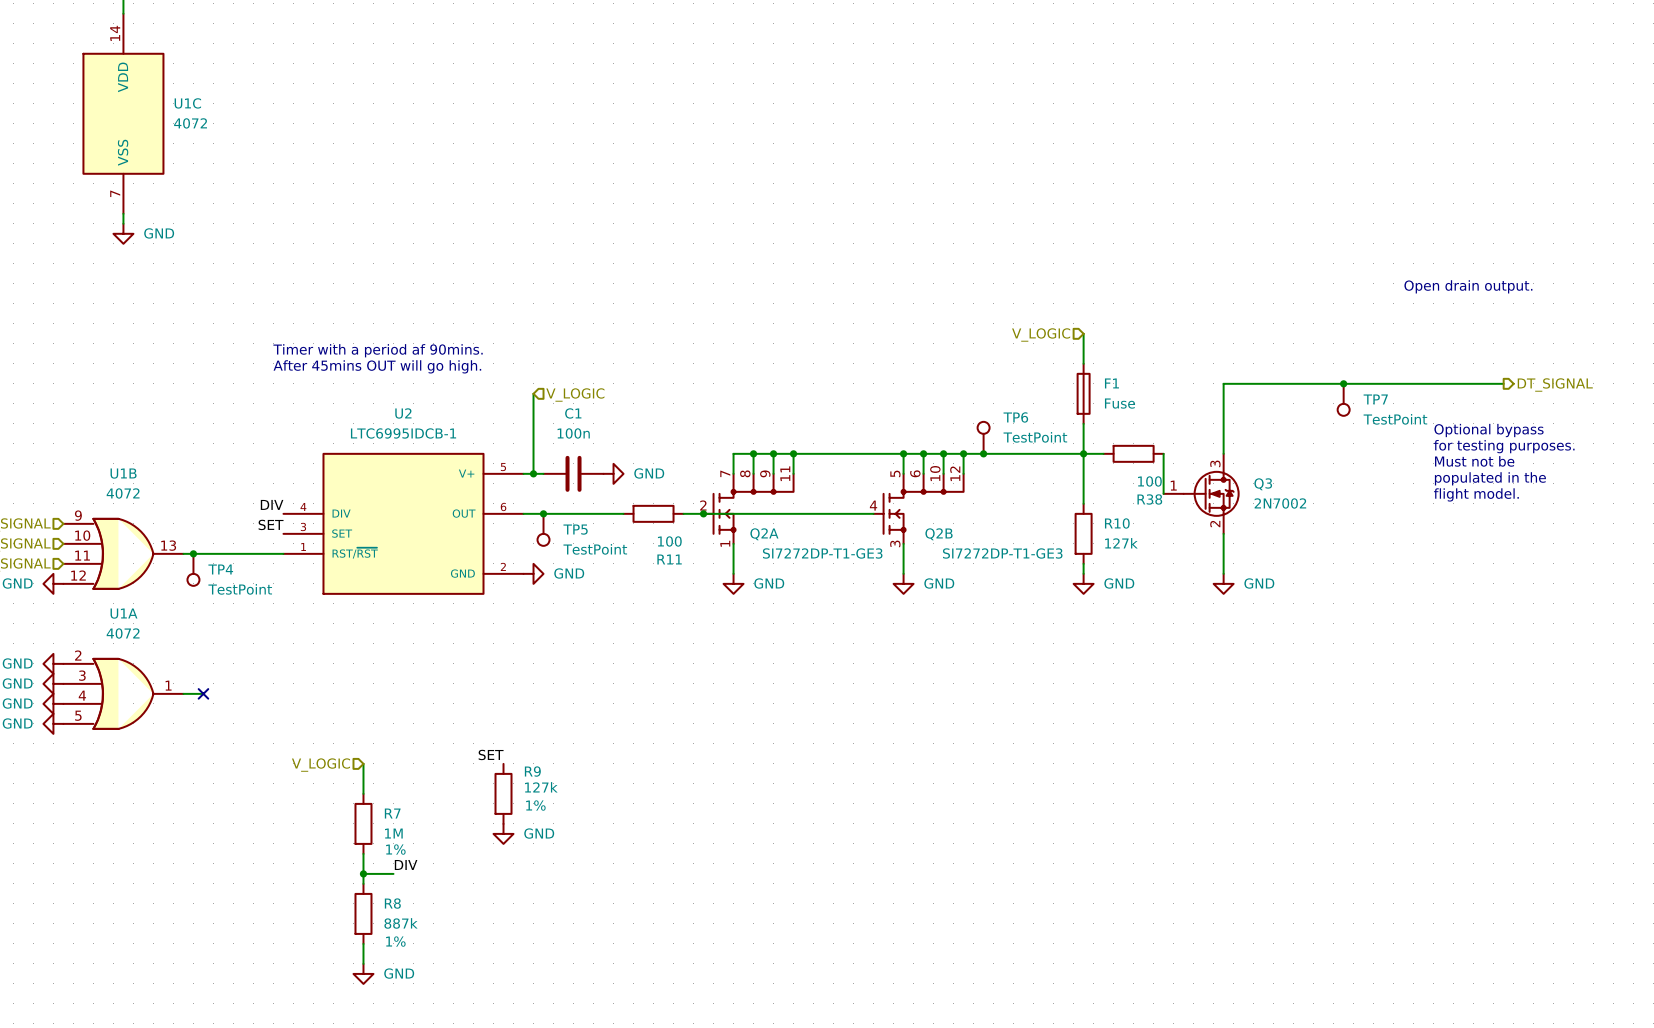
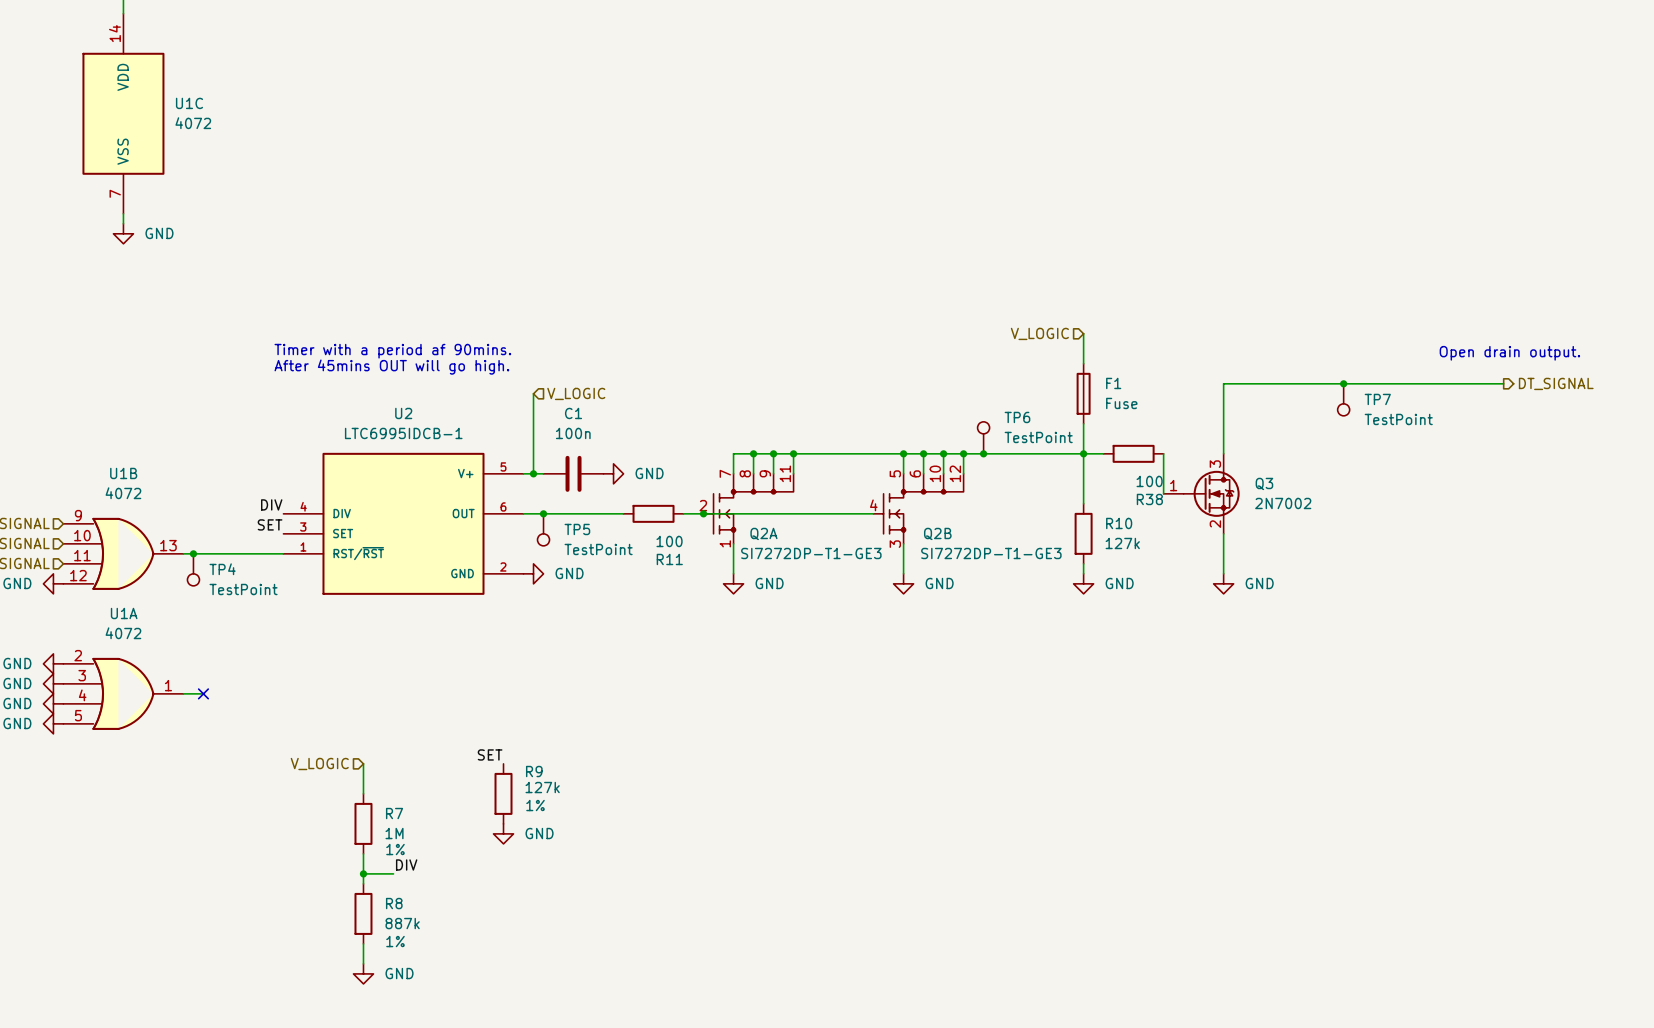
text position: Open drain output. (1468, 286) -> Open drain output. (1509, 353)
text: Optional bypass (1489, 430) -> none
text: for testing purposes. (1504, 446) -> none
text: Must not be (1474, 461) -> none
text: populated in the (1490, 478) -> none
text: flight model. (1476, 494) -> none

